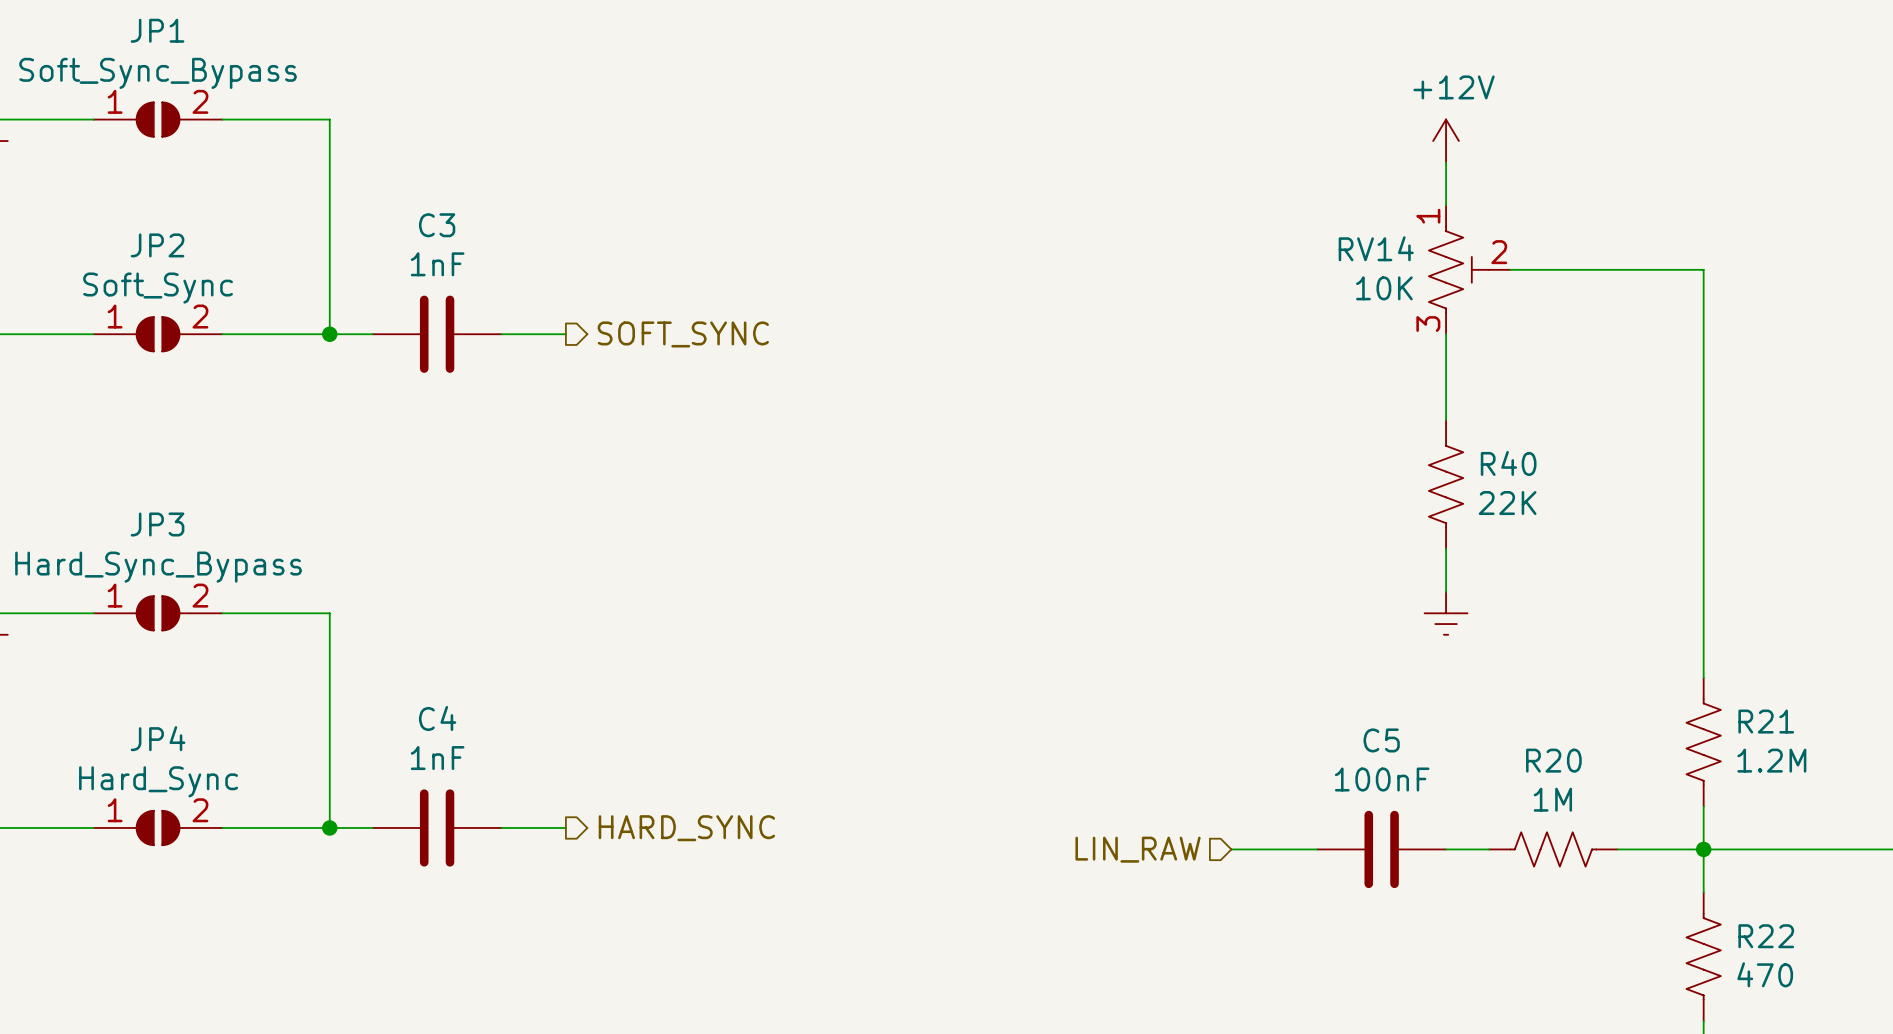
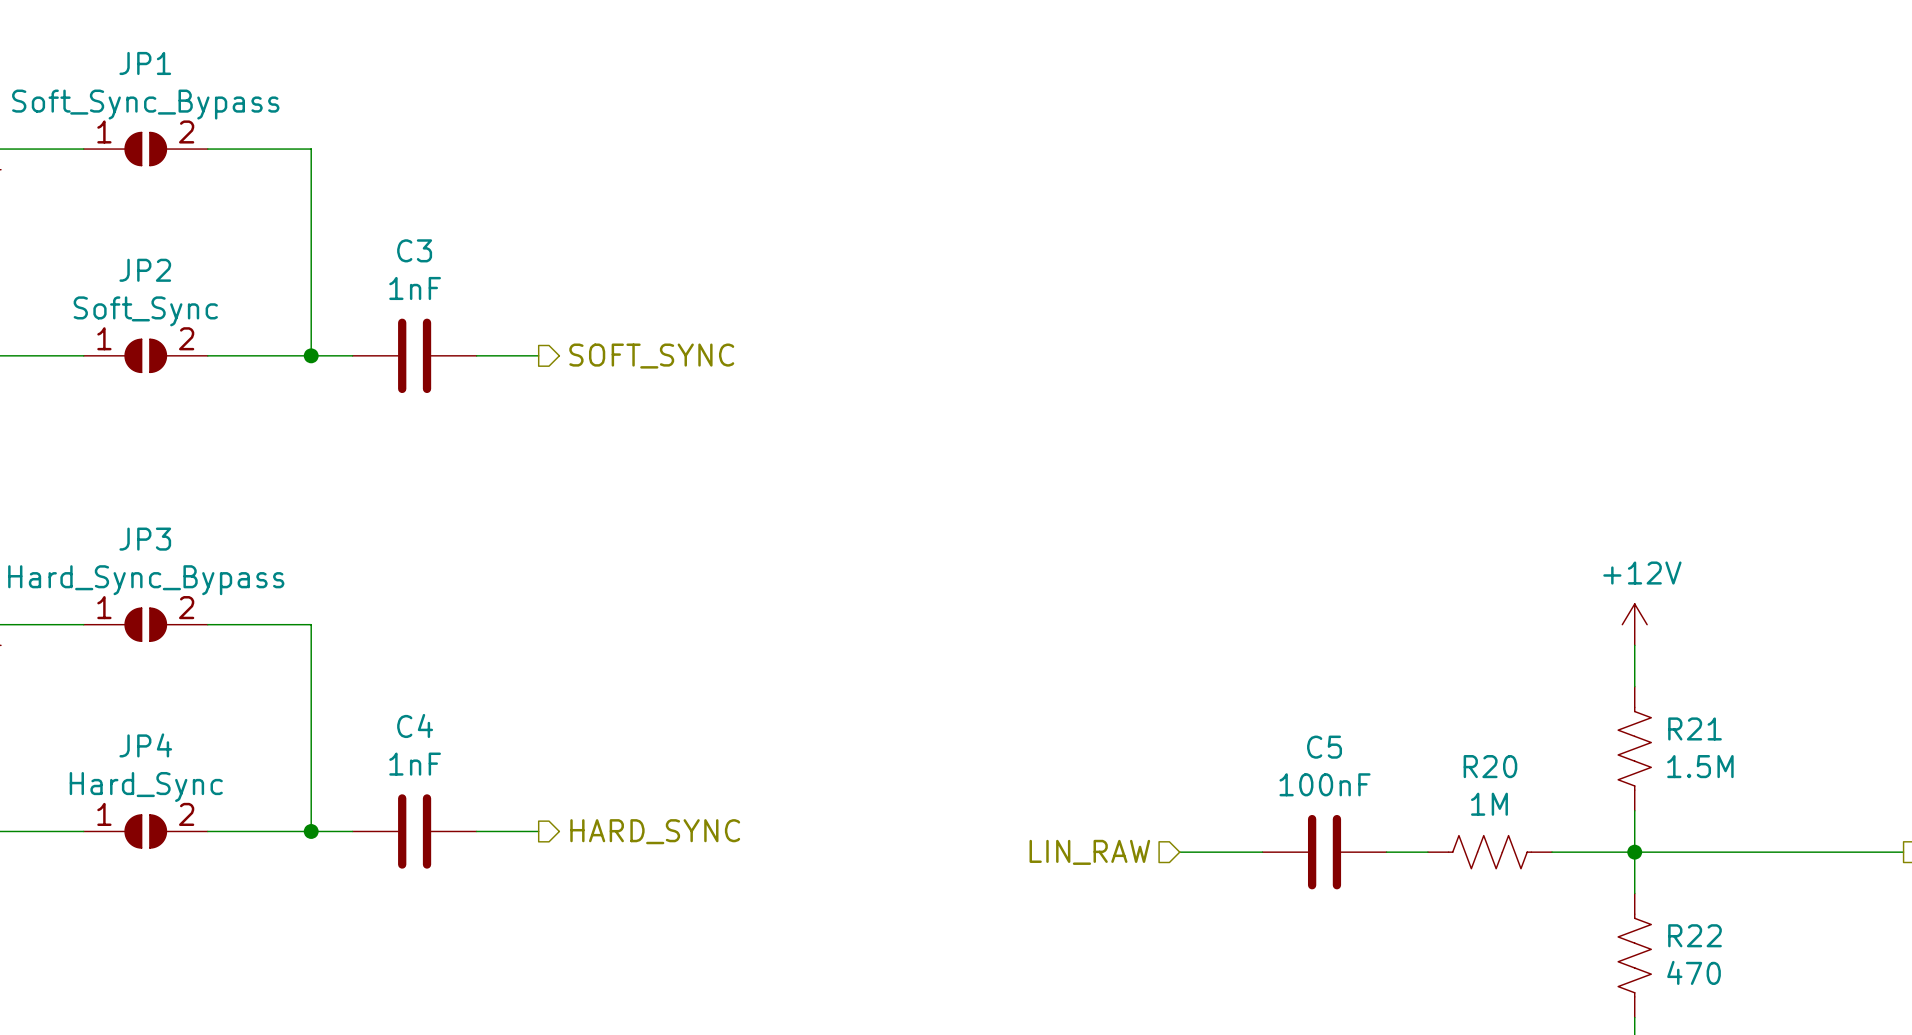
power symbol: +12V (1446, 141) -> none
wire: (1446, 162) (1446, 205) -> none
RV14: 10K (1469, 269) -> none
wire: (1510, 269) (1703, 269) (1703, 634) -> none
wire: (1446, 334) (1446, 420) -> none
R40: 22K (1446, 484) -> none
wire: (1446, 548) (1446, 591) -> none
power symbol: (1446, 613) -> none
power symbol: none -> +12V (1634, 624)
R21 value: 1.2M (1771, 760) -> 1.5M (1700, 766)

